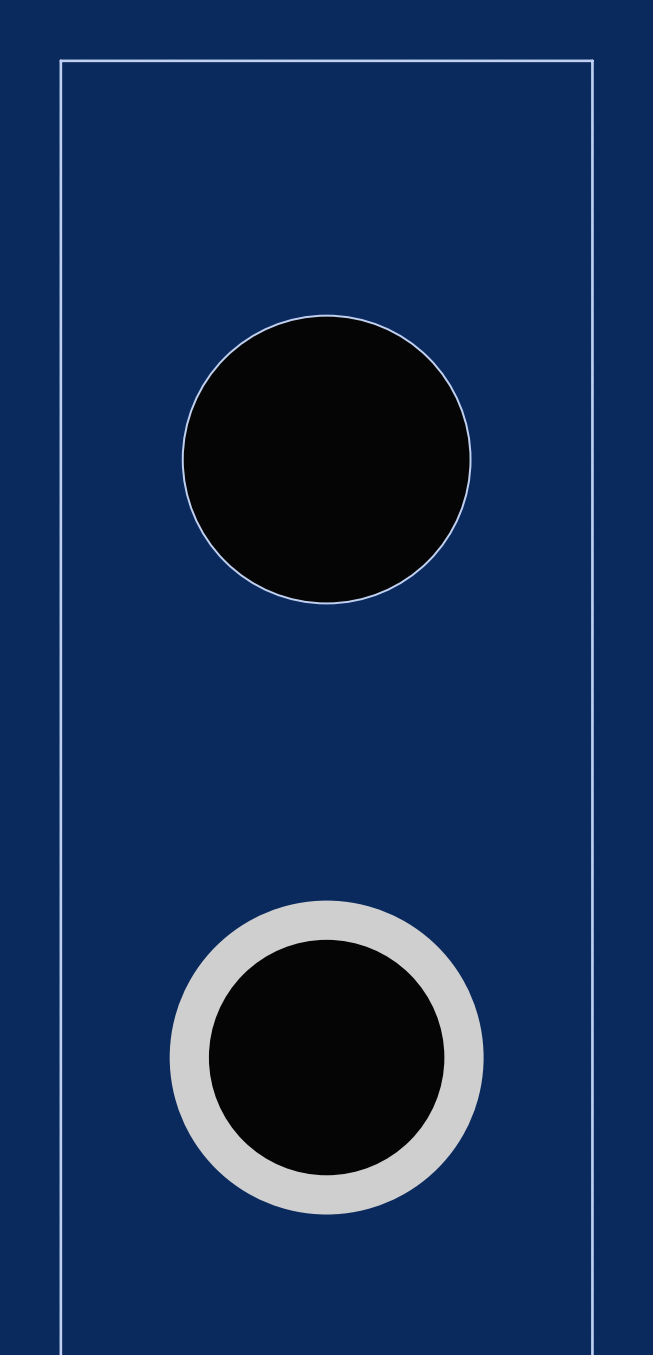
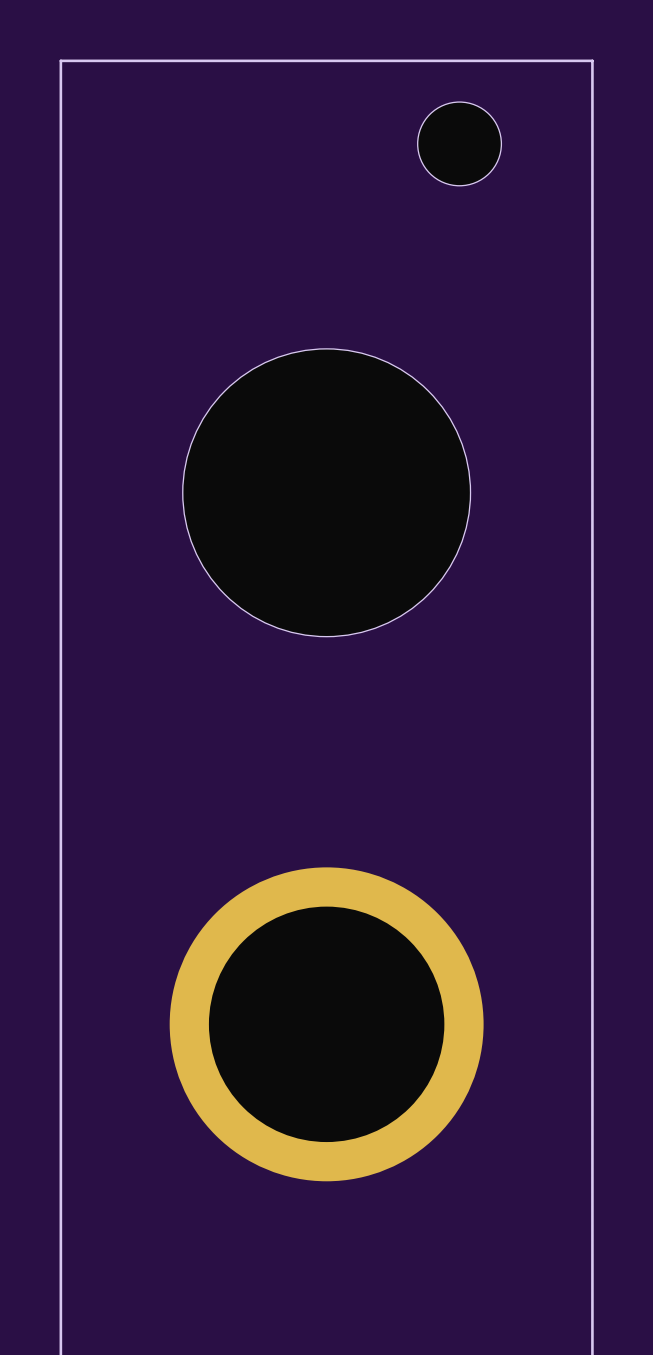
part: none -> (459, 143)
part position: (326, 459) -> (326, 492)
part position: (326, 1057) -> (326, 1024)

